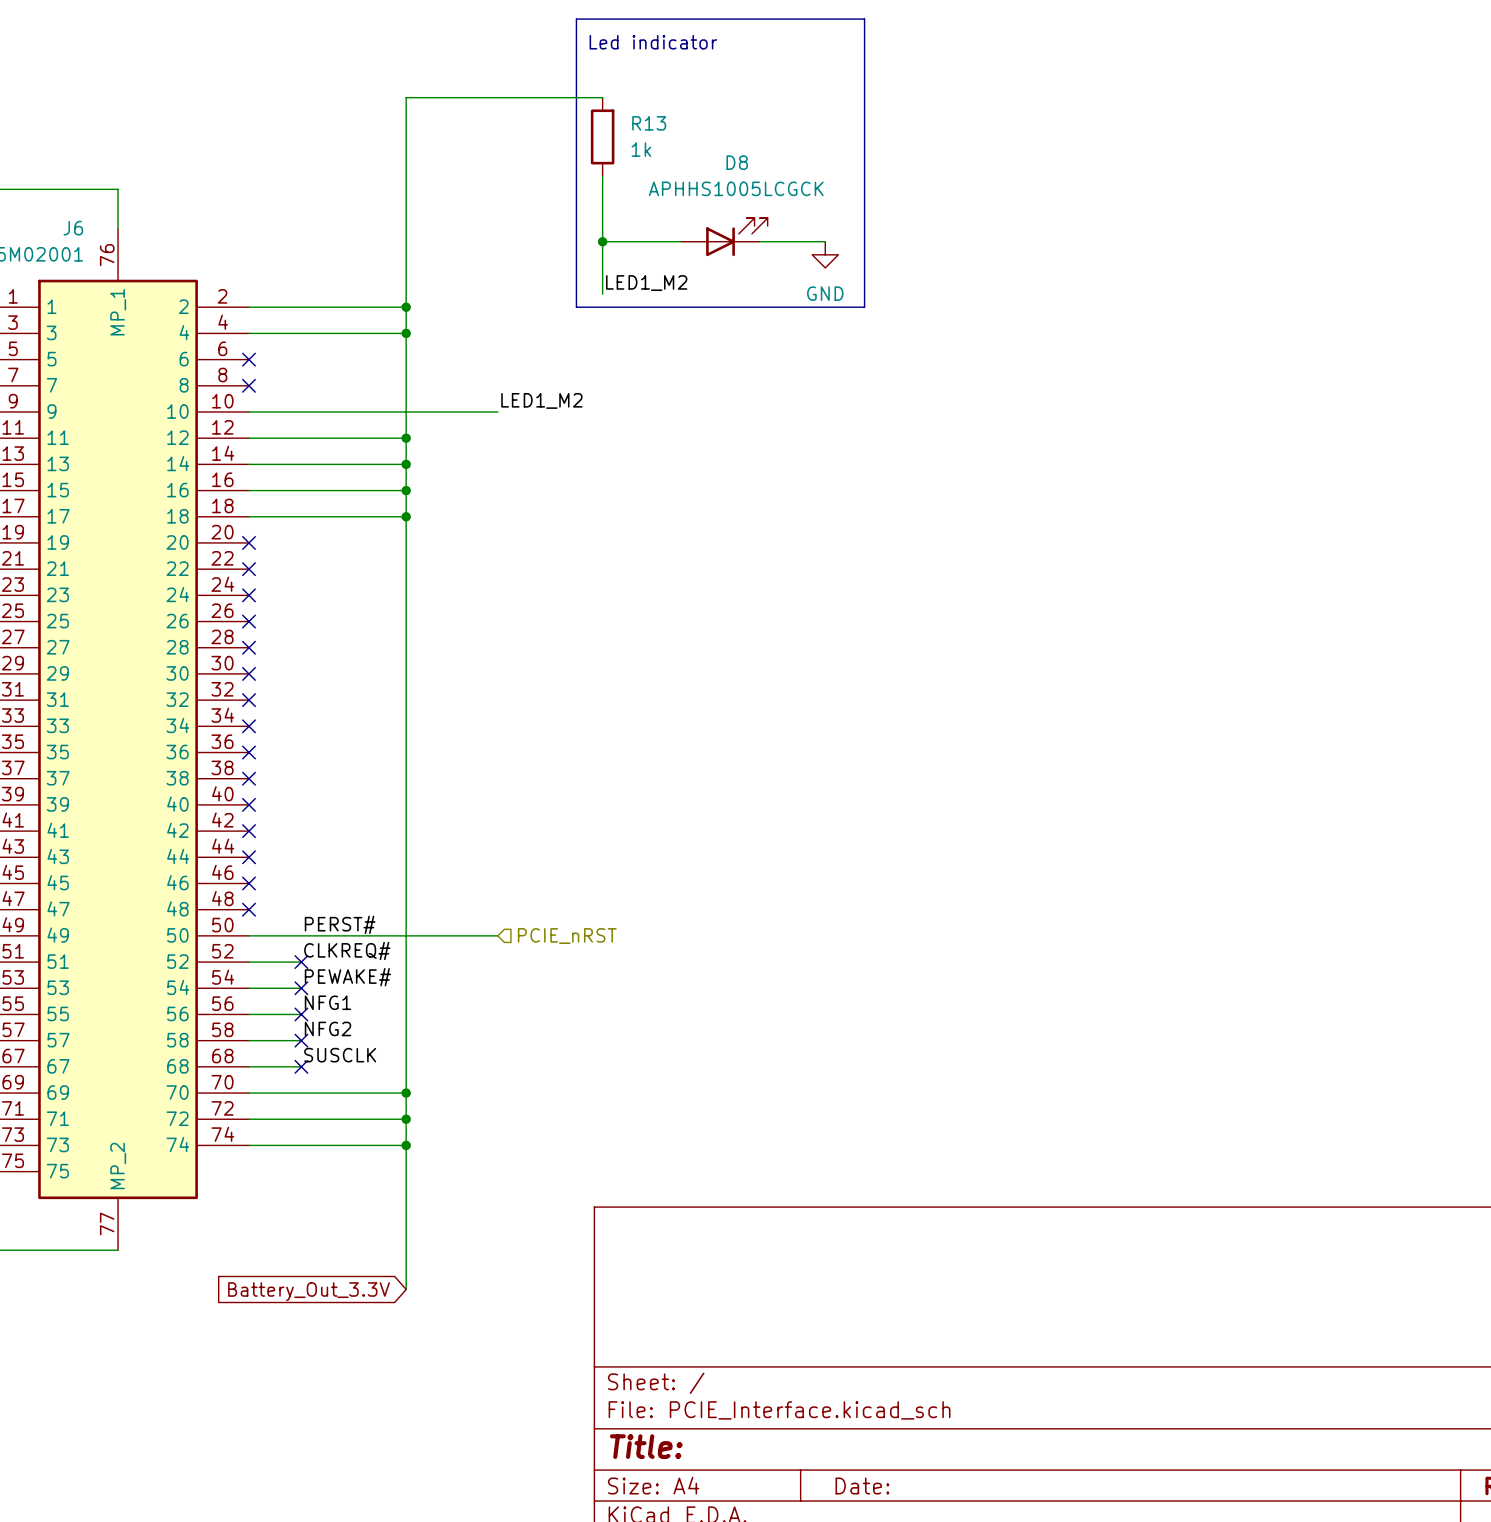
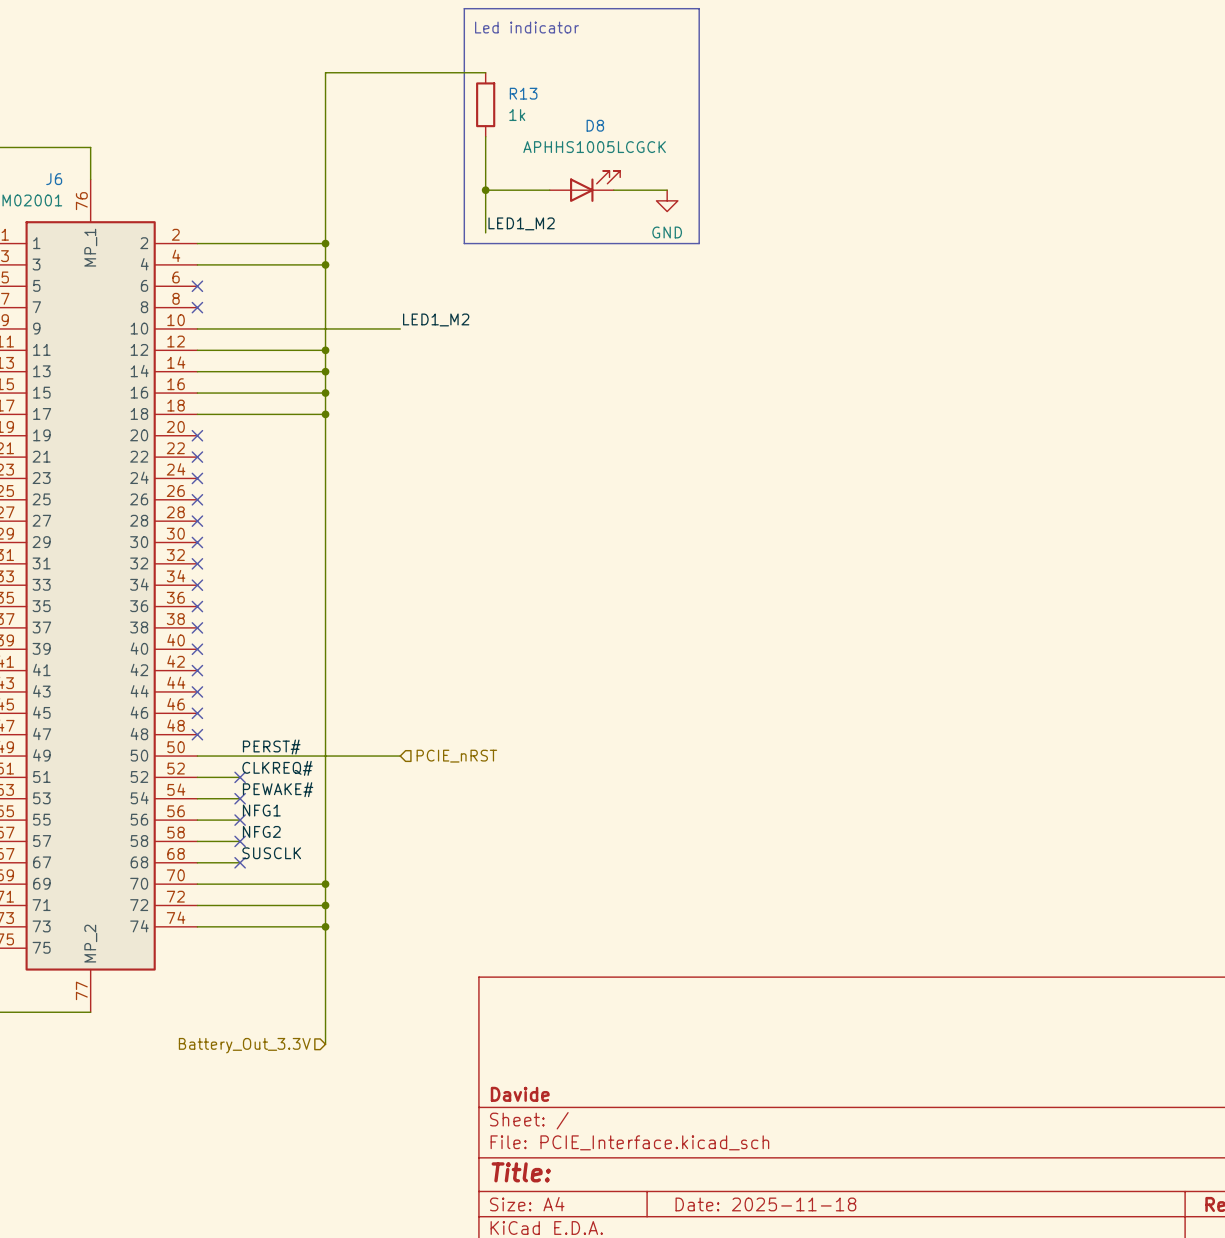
hierarchical label: none -> Battery_Out_3.3V (244, 1045)
global label: Battery_Out_3.3V (309, 1291) -> none
title block: none -> Davide (520, 1094)
title block: Date: (862, 1485) -> Date: 2025-11-18 (765, 1204)

